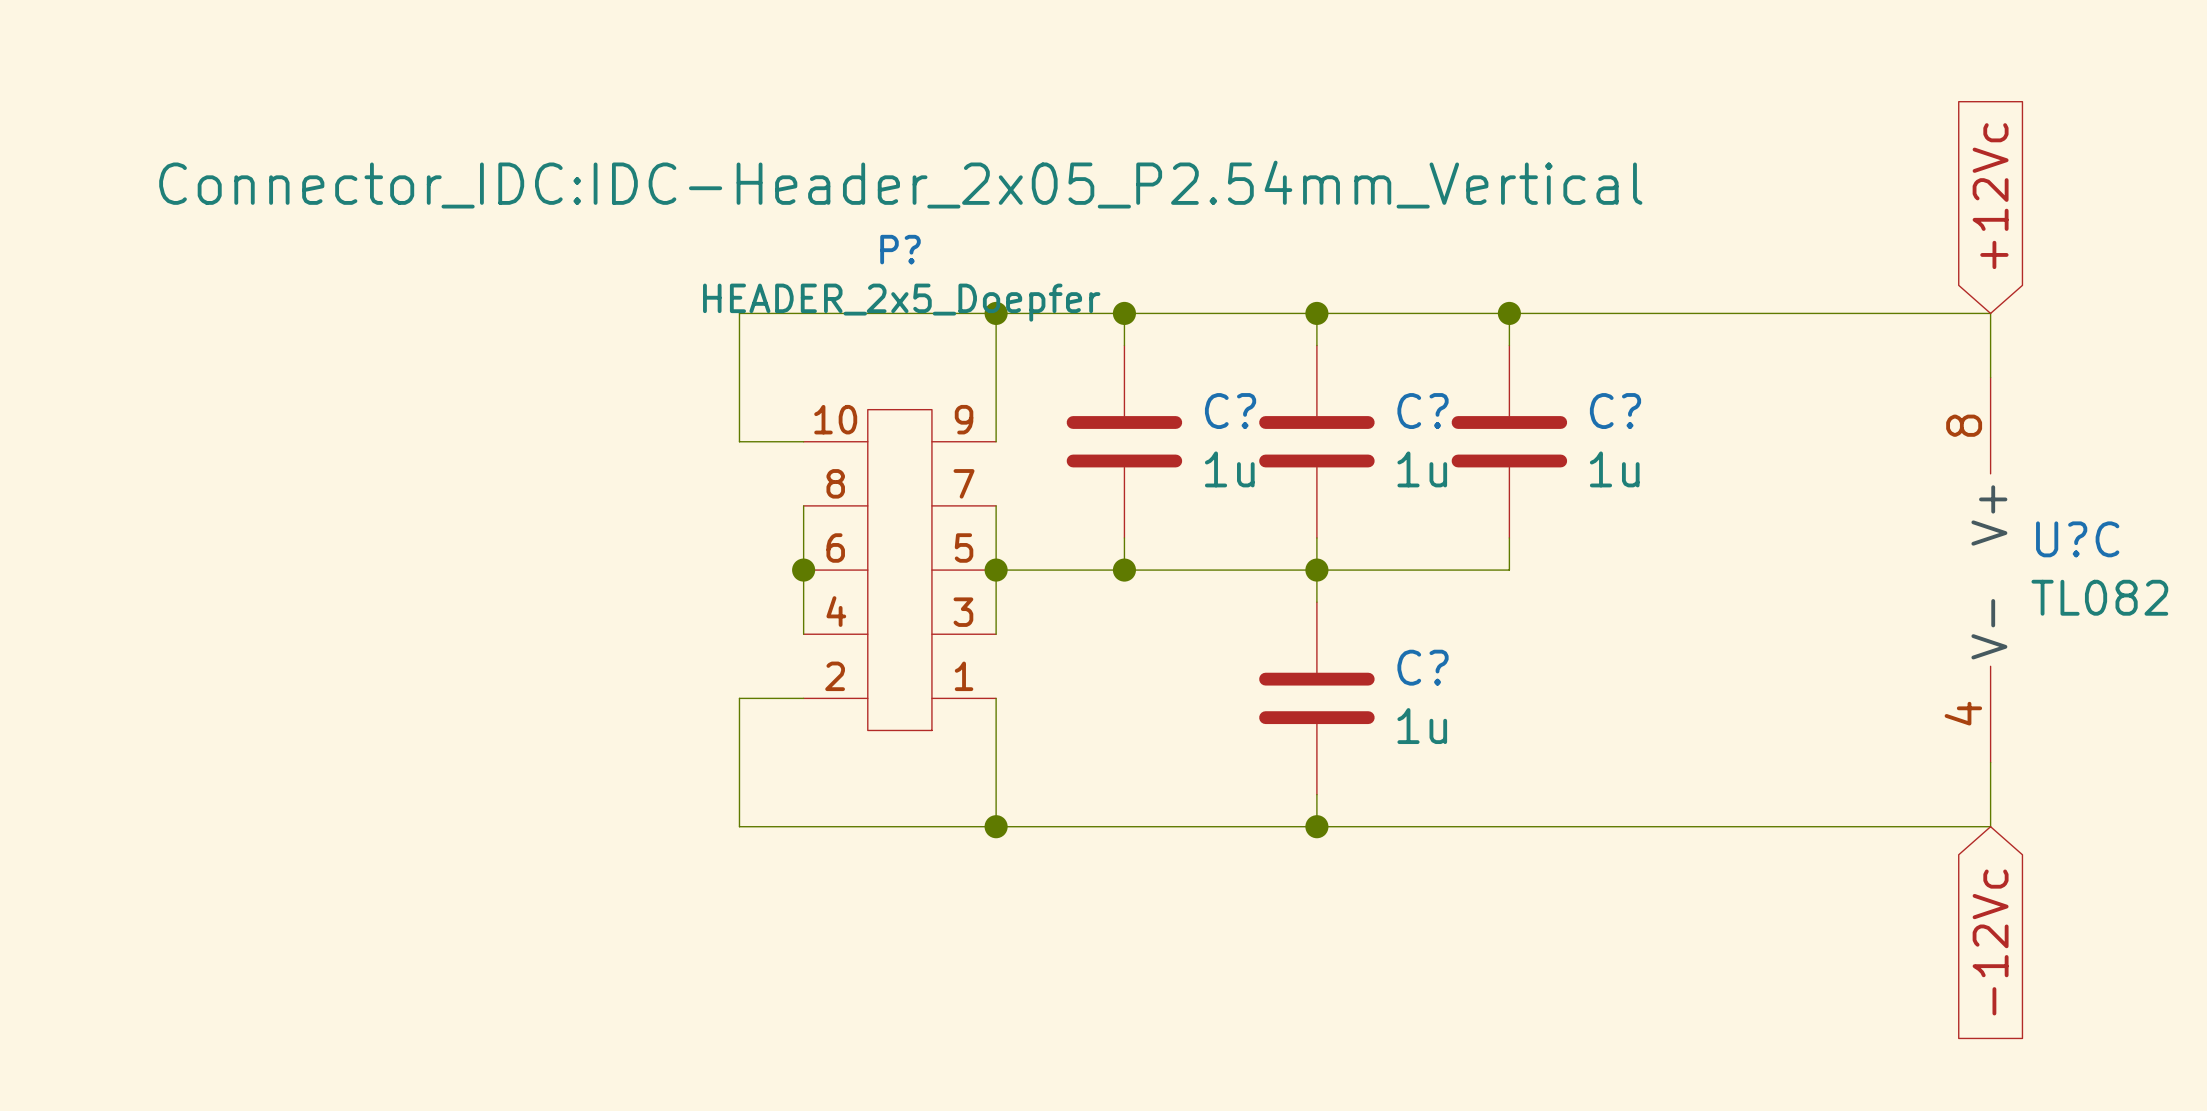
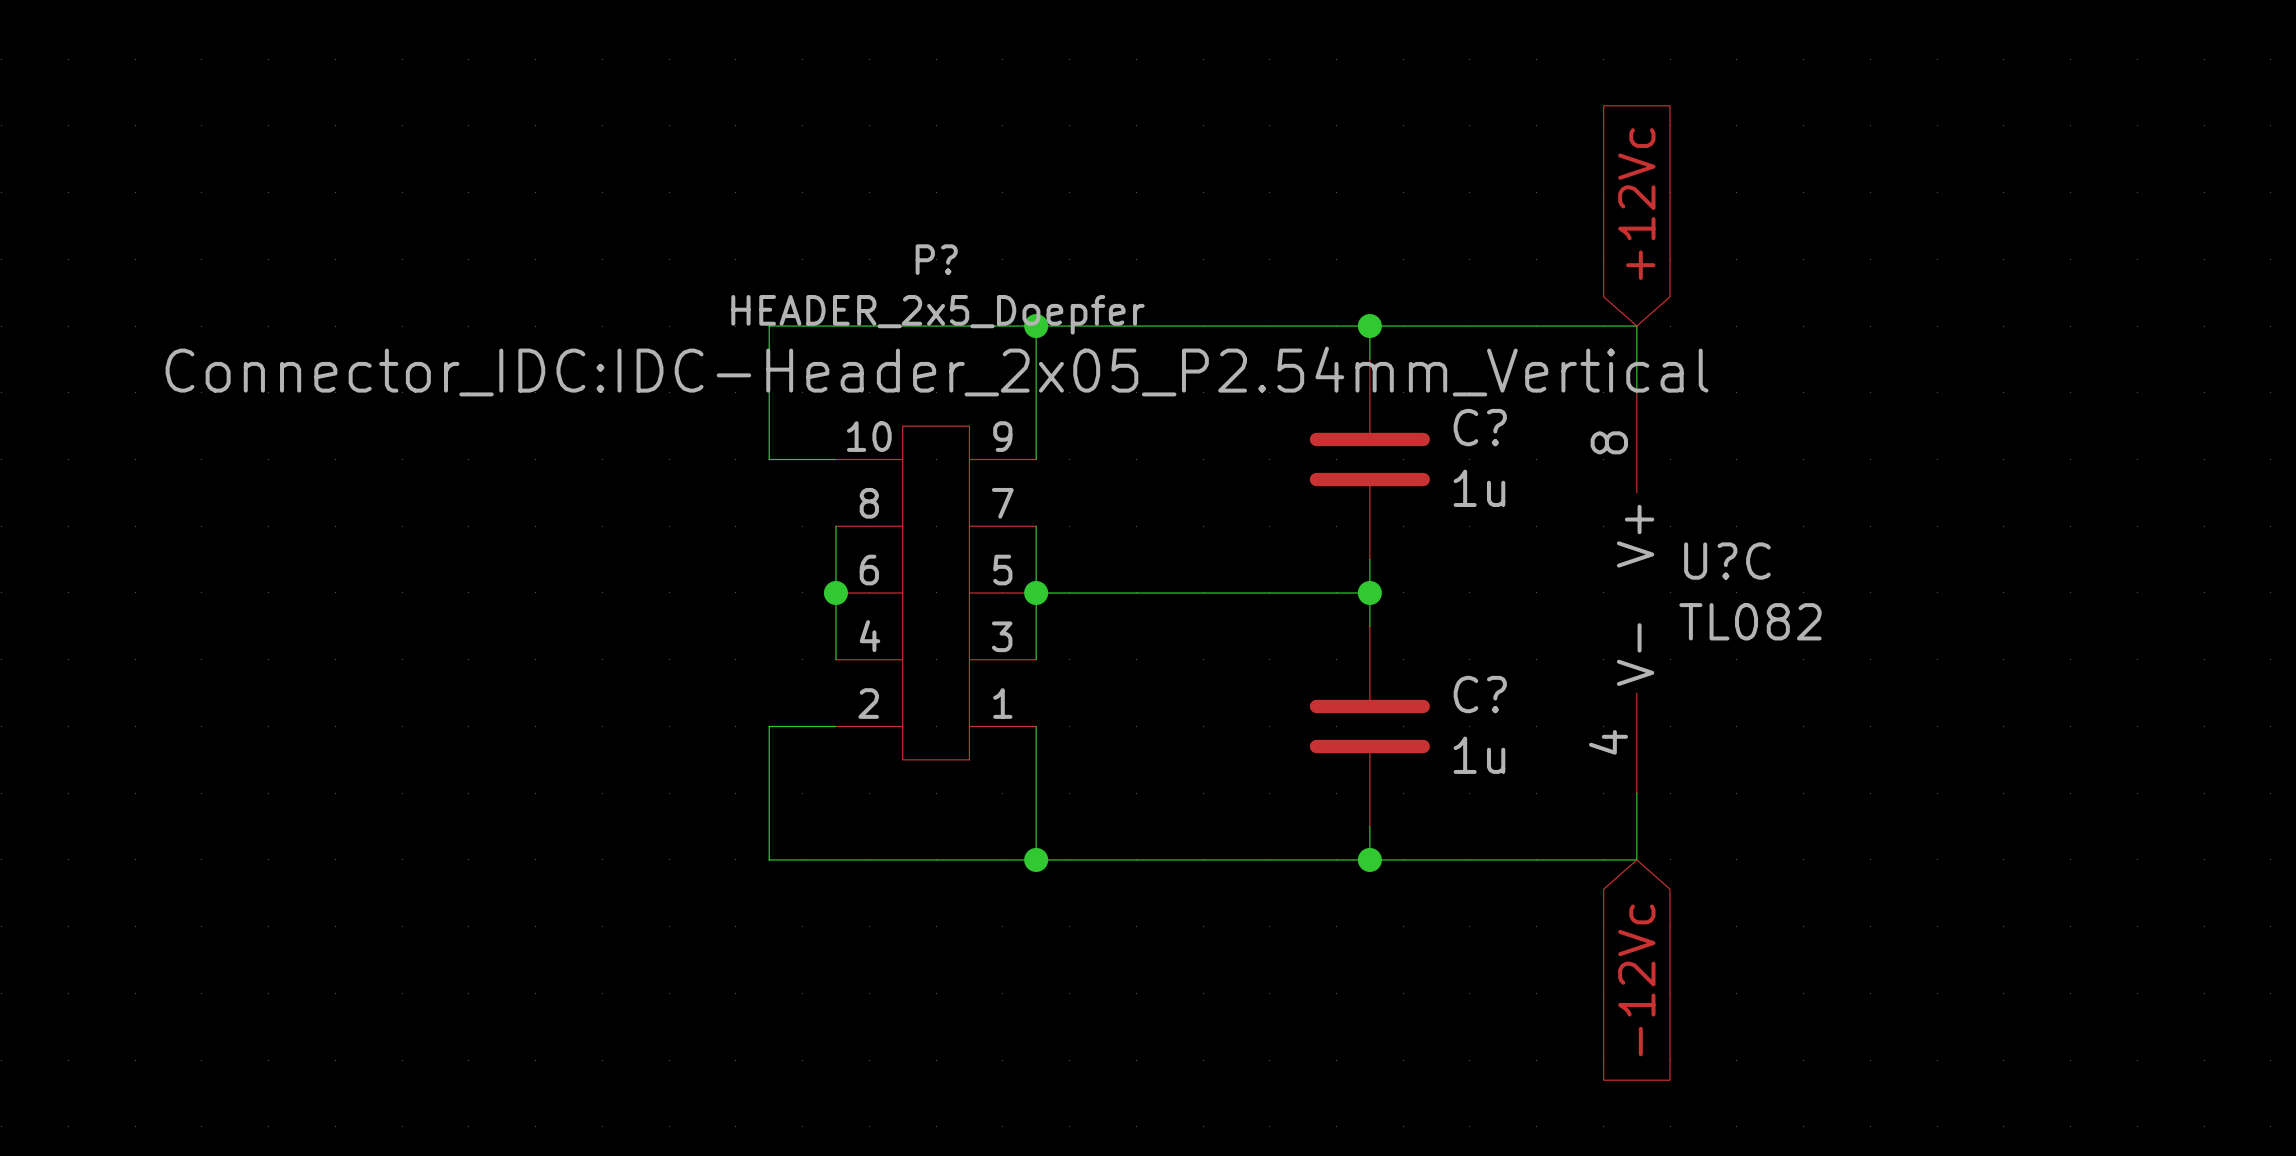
P? text position: Connector_IDC:IDC-Header_2x05_P2.54mm_Vertical (900, 184) -> Connector_IDC:IDC-Header_2x05_P2.54mm_Vertical (937, 371)
global label position: +12Vc (1990, 196) -> +12Vc (1636, 204)
wire: (1124, 313) (1124, 345) -> none
junction: (1124, 313) -> none
wire: (1509, 313) (1509, 345) -> none
junction: (1509, 313) -> none
wire: (1573, 313) (1990, 313) (1990, 377) -> (1636, 326) (1636, 392)
C?: 1u (1124, 441) -> none
C?: 1u (1509, 441) -> none
wire: (1124, 537) (1124, 570) -> none
wire: (1509, 537) (1509, 570) (1316, 570) -> none
junction: (1124, 570) -> none
U?C position: (1990, 570) -> (1636, 592)
wire: (1990, 762) (1990, 826) (1573, 826) -> (1636, 793) (1636, 859)
global label position: -12Vc (1990, 942) -> -12Vc (1636, 980)

